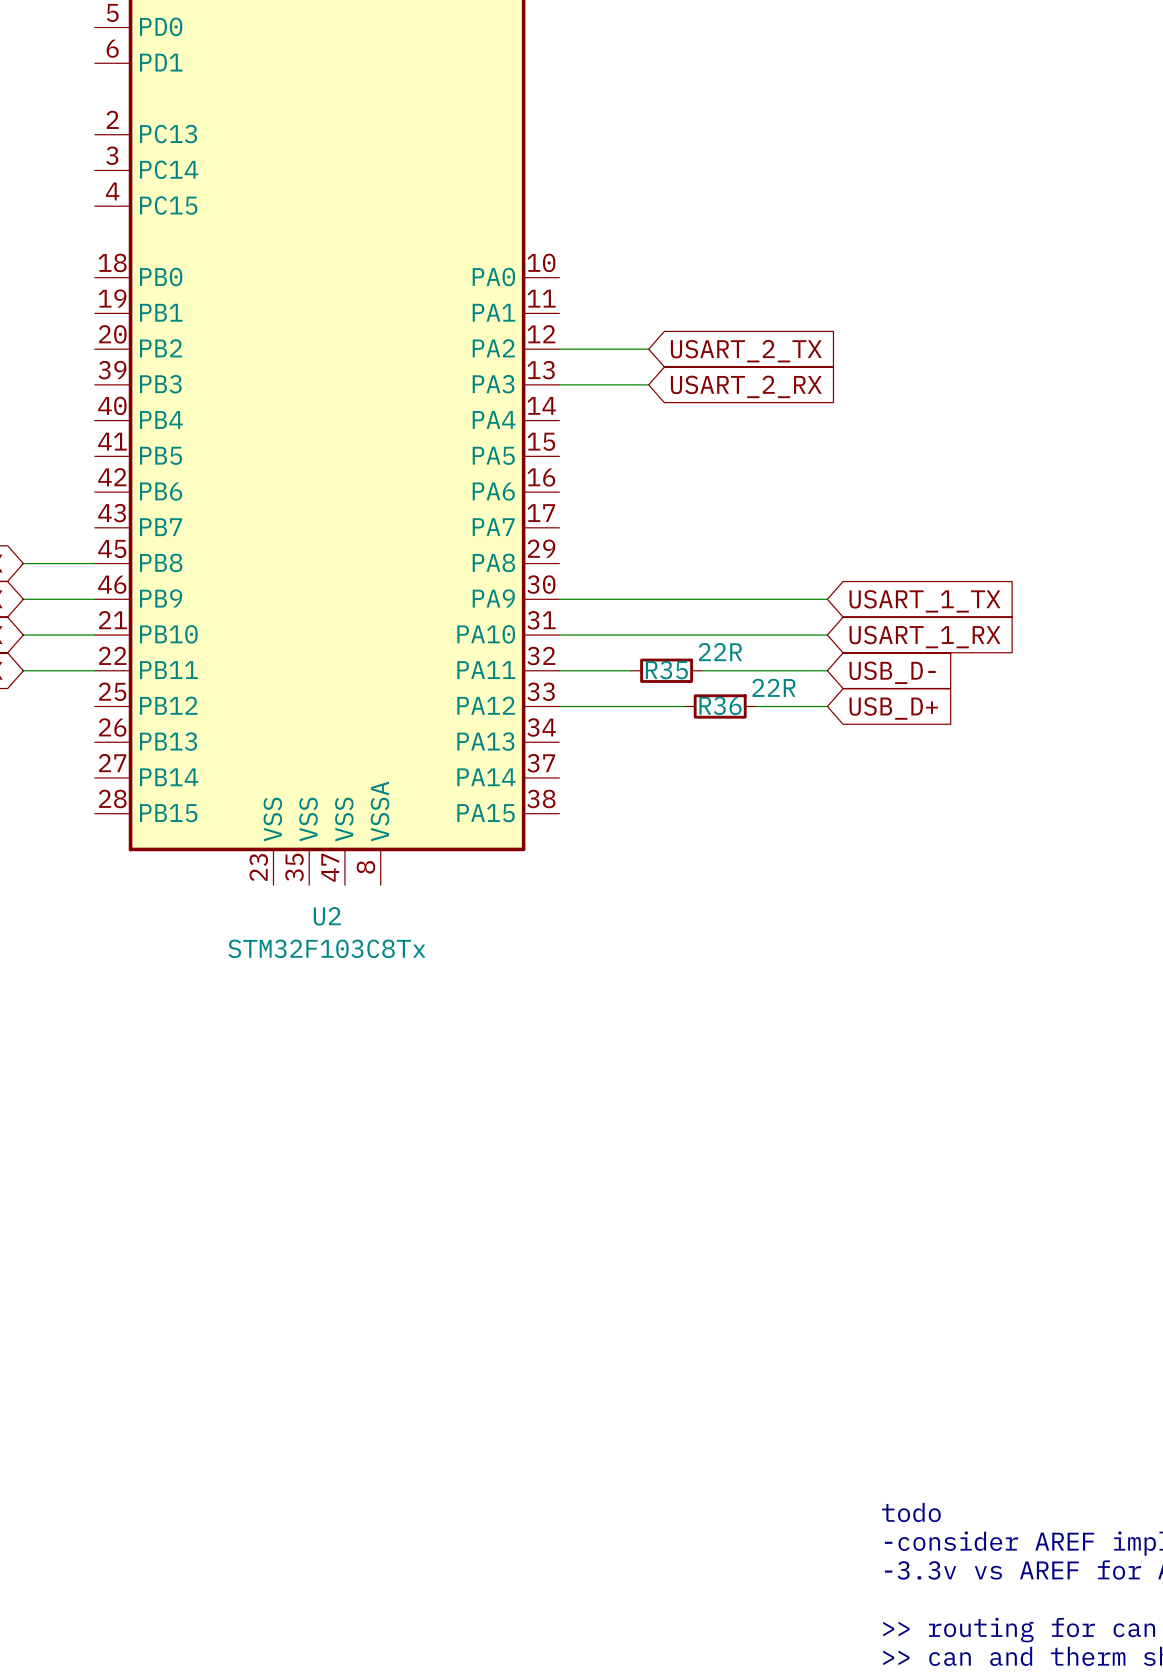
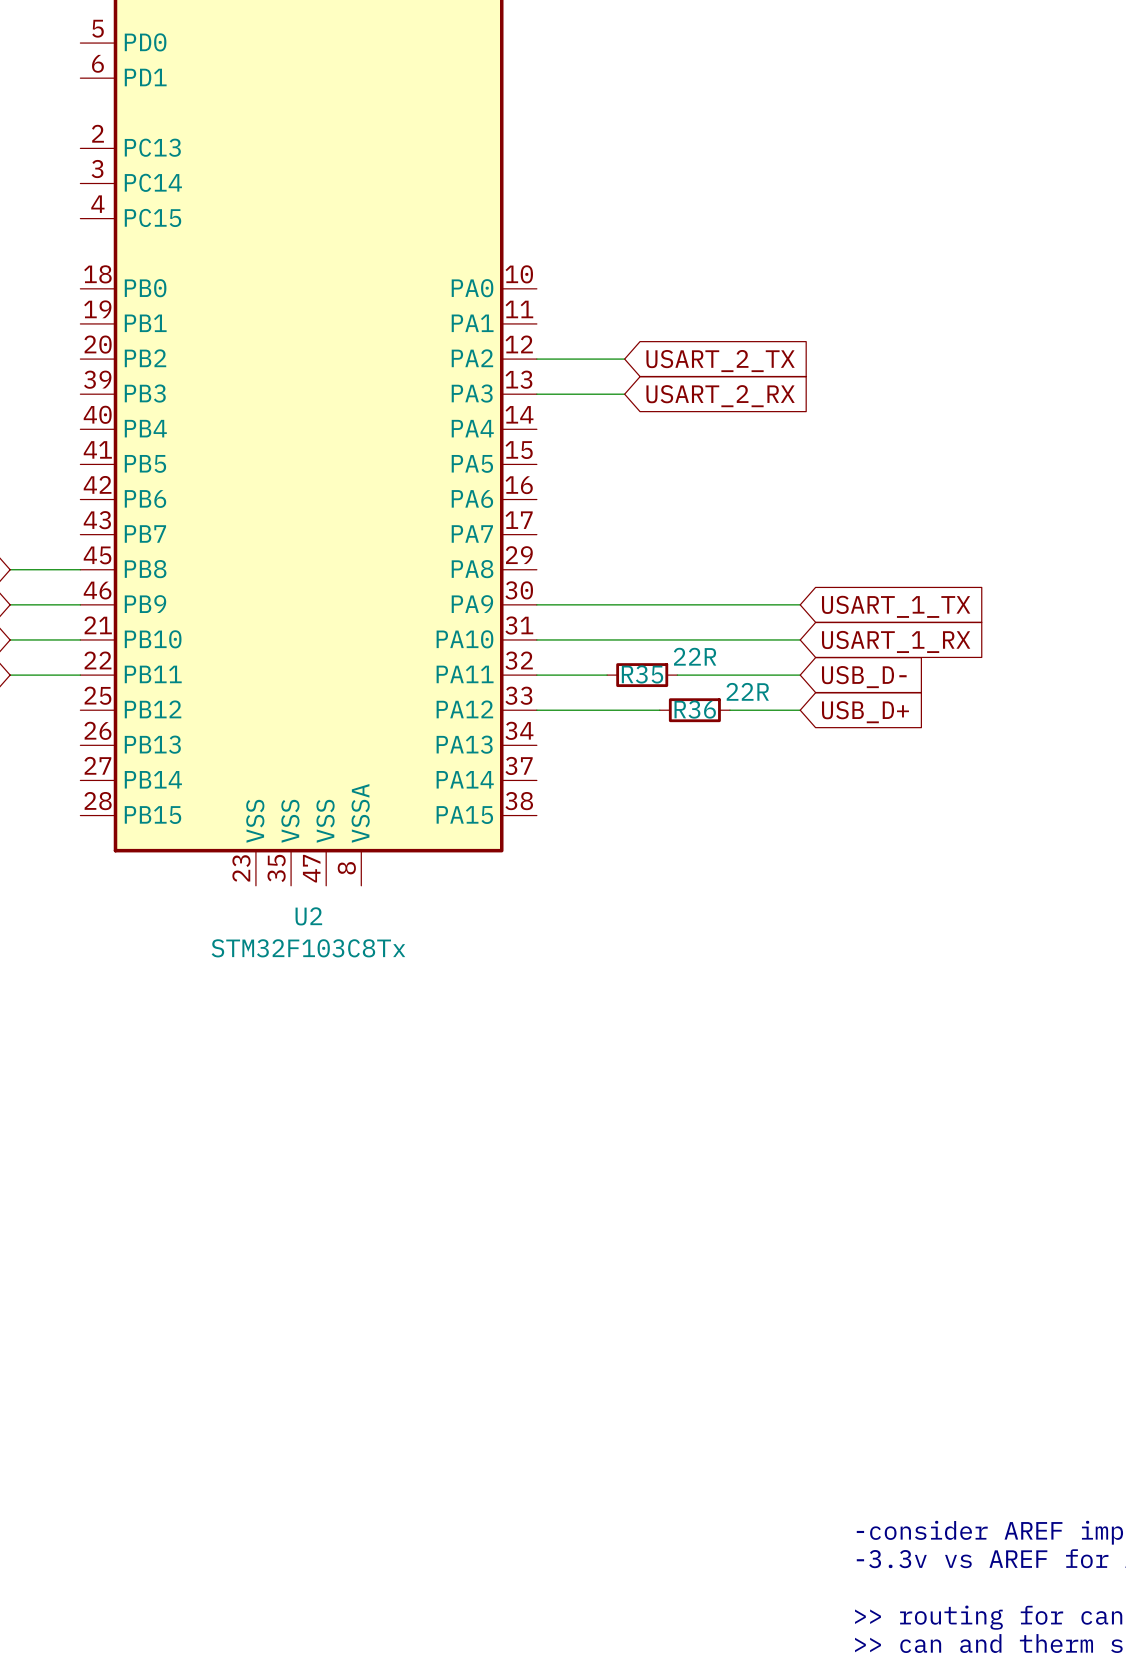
text: todo (911, 1512) -> none

